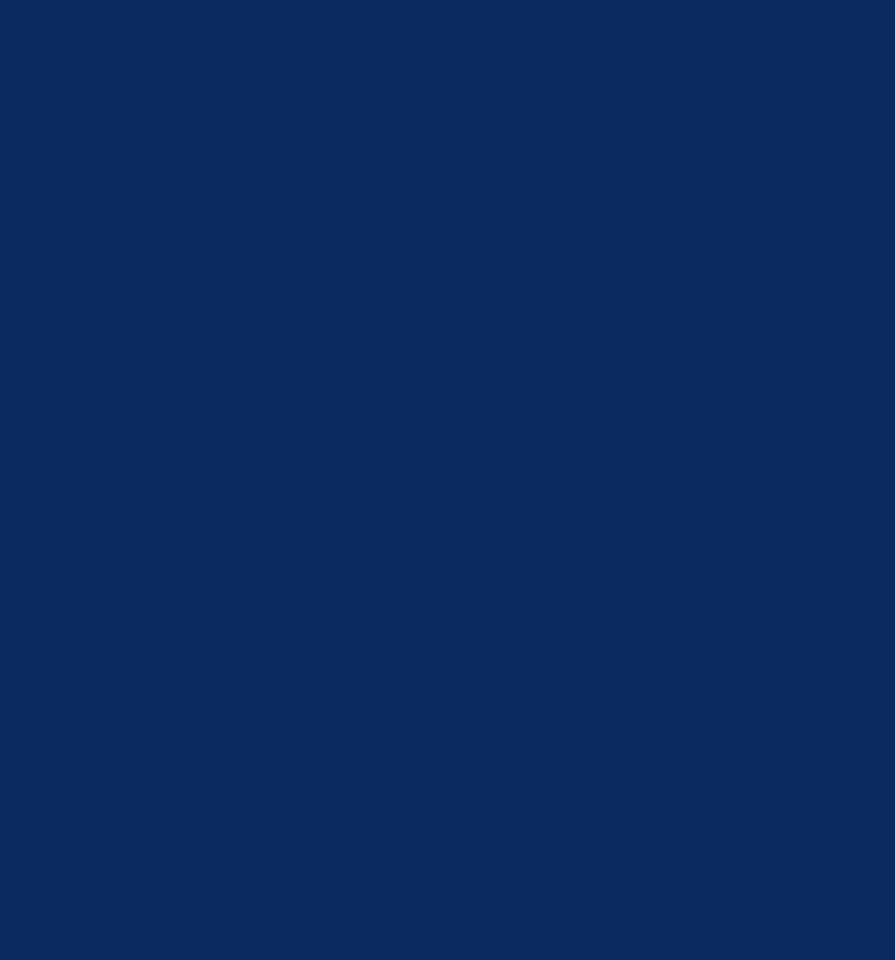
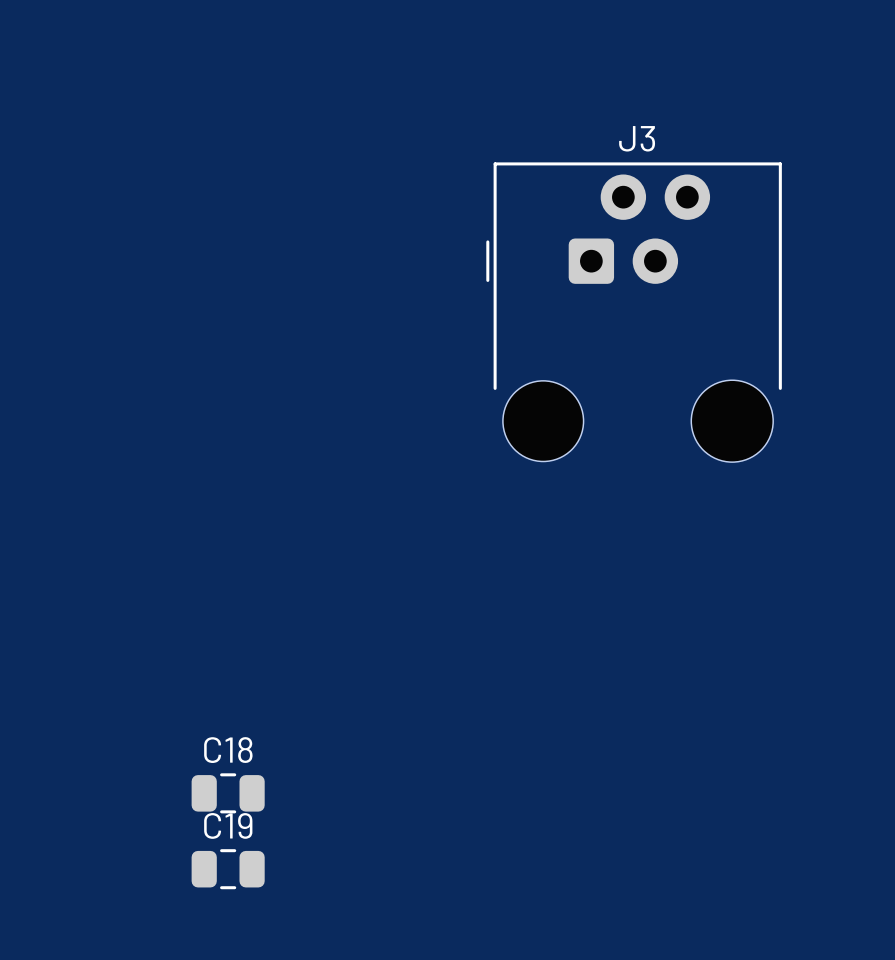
J3: none -> (634, 312)
C18: none -> (228, 793)
C19: none -> (228, 869)

